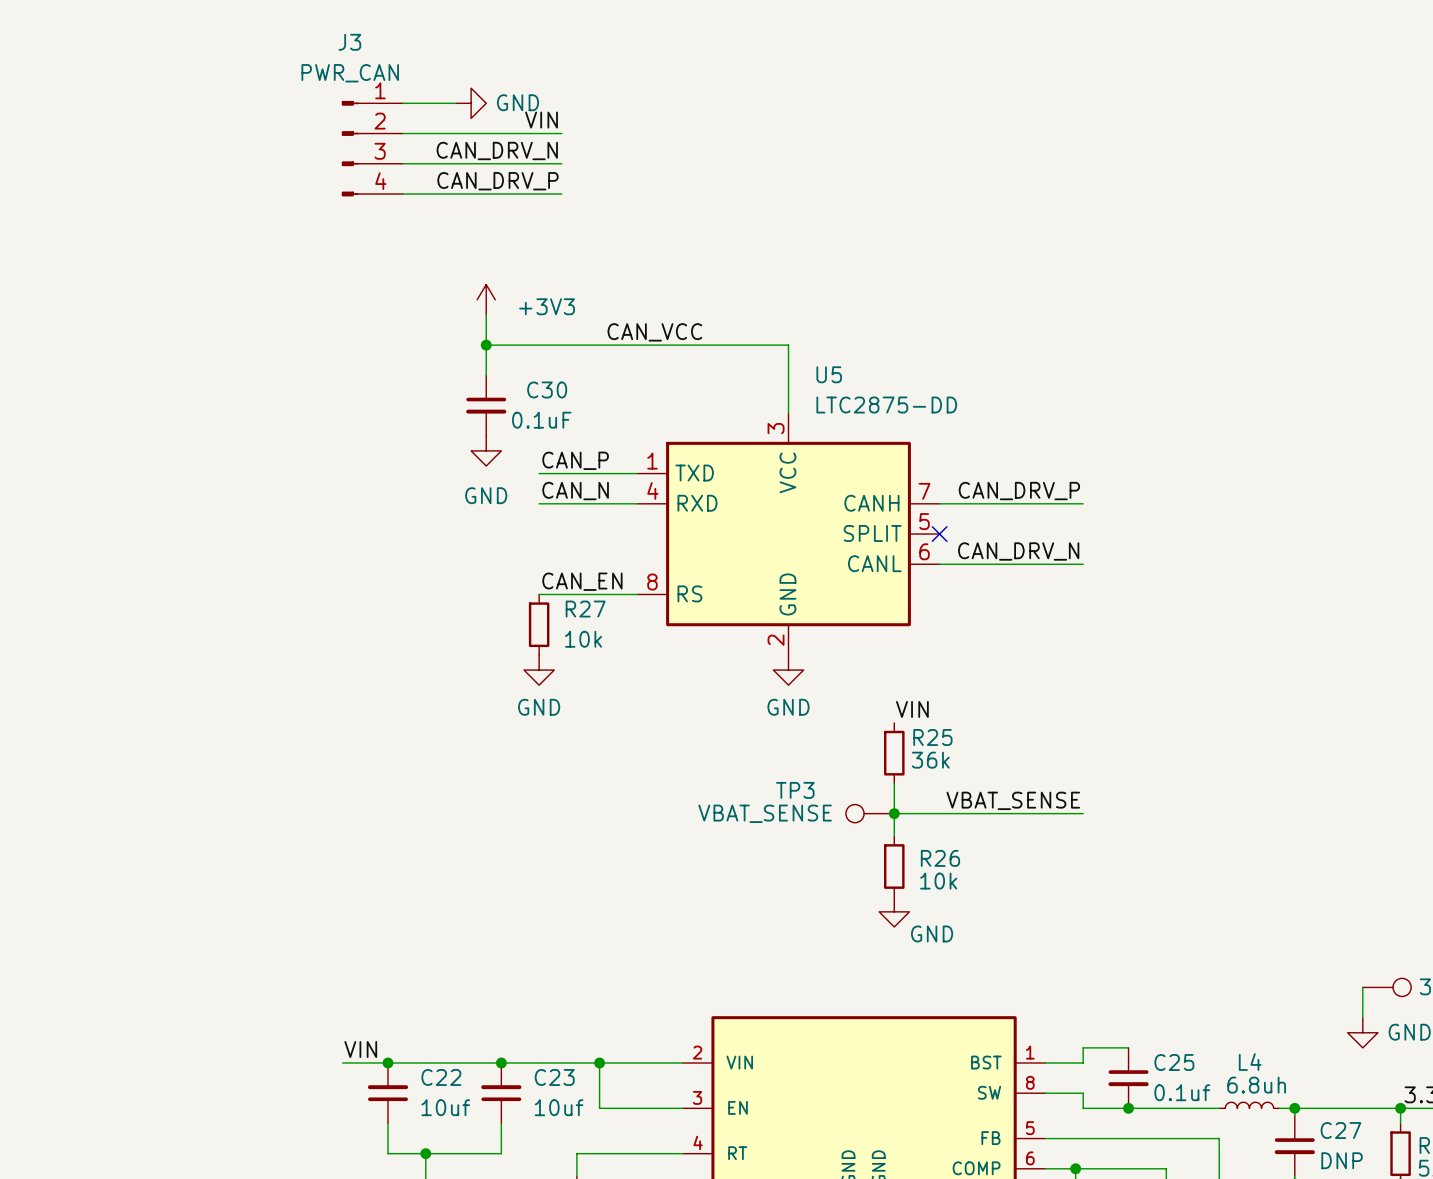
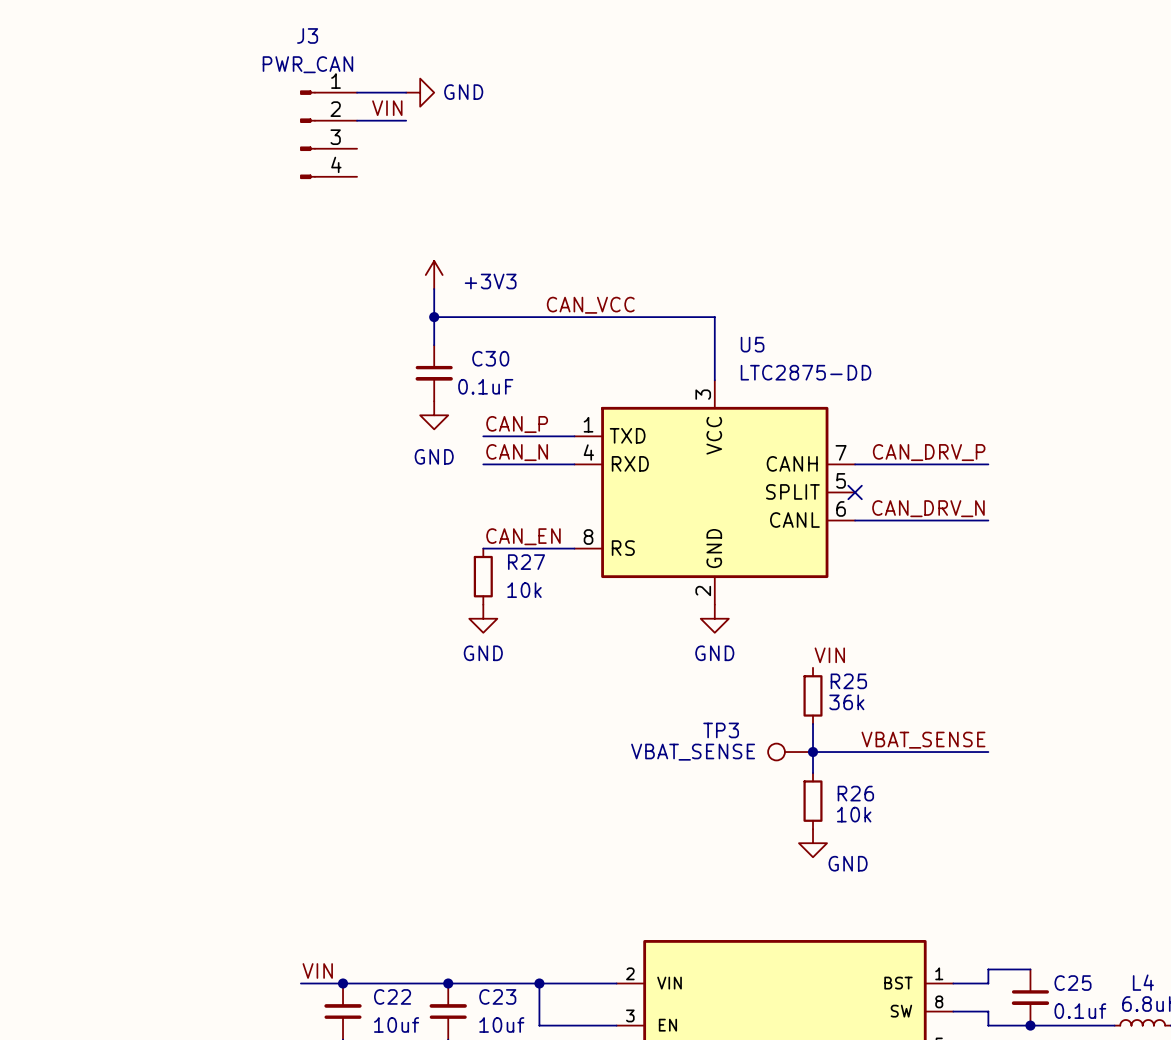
label position: VIN (541, 120) -> VIN (387, 108)
wire: (456, 133) (561, 133) -> none
label: CAN_DRV_N (497, 151) -> none
wire: (403, 163) (561, 163) -> none
label: CAN_DRV_P (497, 181) -> none
wire: (403, 193) (561, 193) -> none

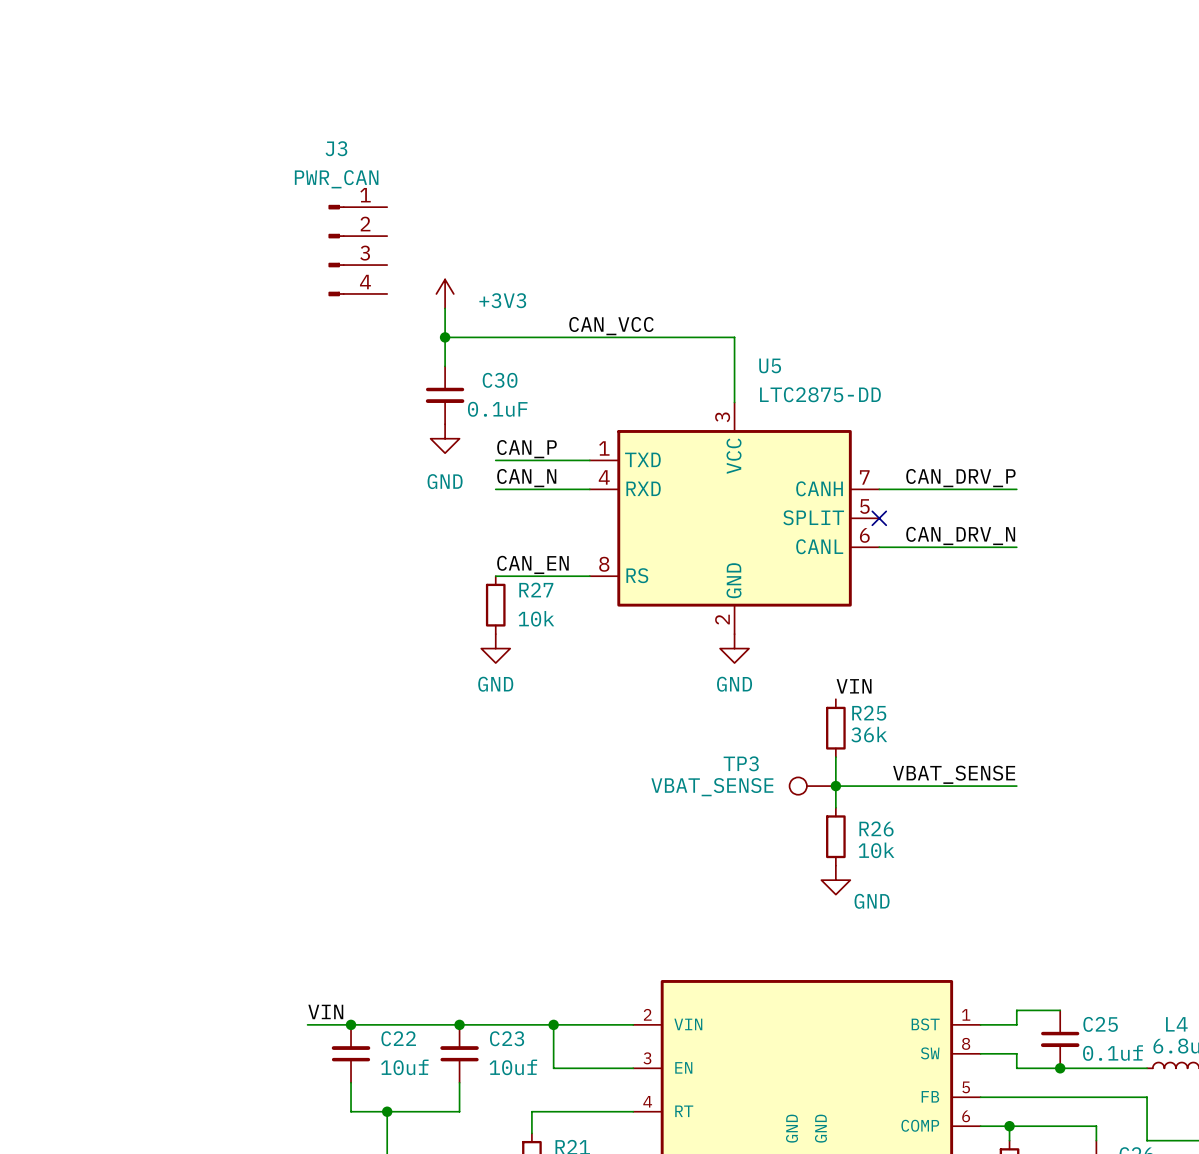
wire: (357, 92) (406, 92) -> none
power symbol: GND (420, 92) -> none
label: VIN (387, 108) -> none
wire: (357, 120) (406, 120) -> none
J3 position: (328, 134) -> (357, 250)

